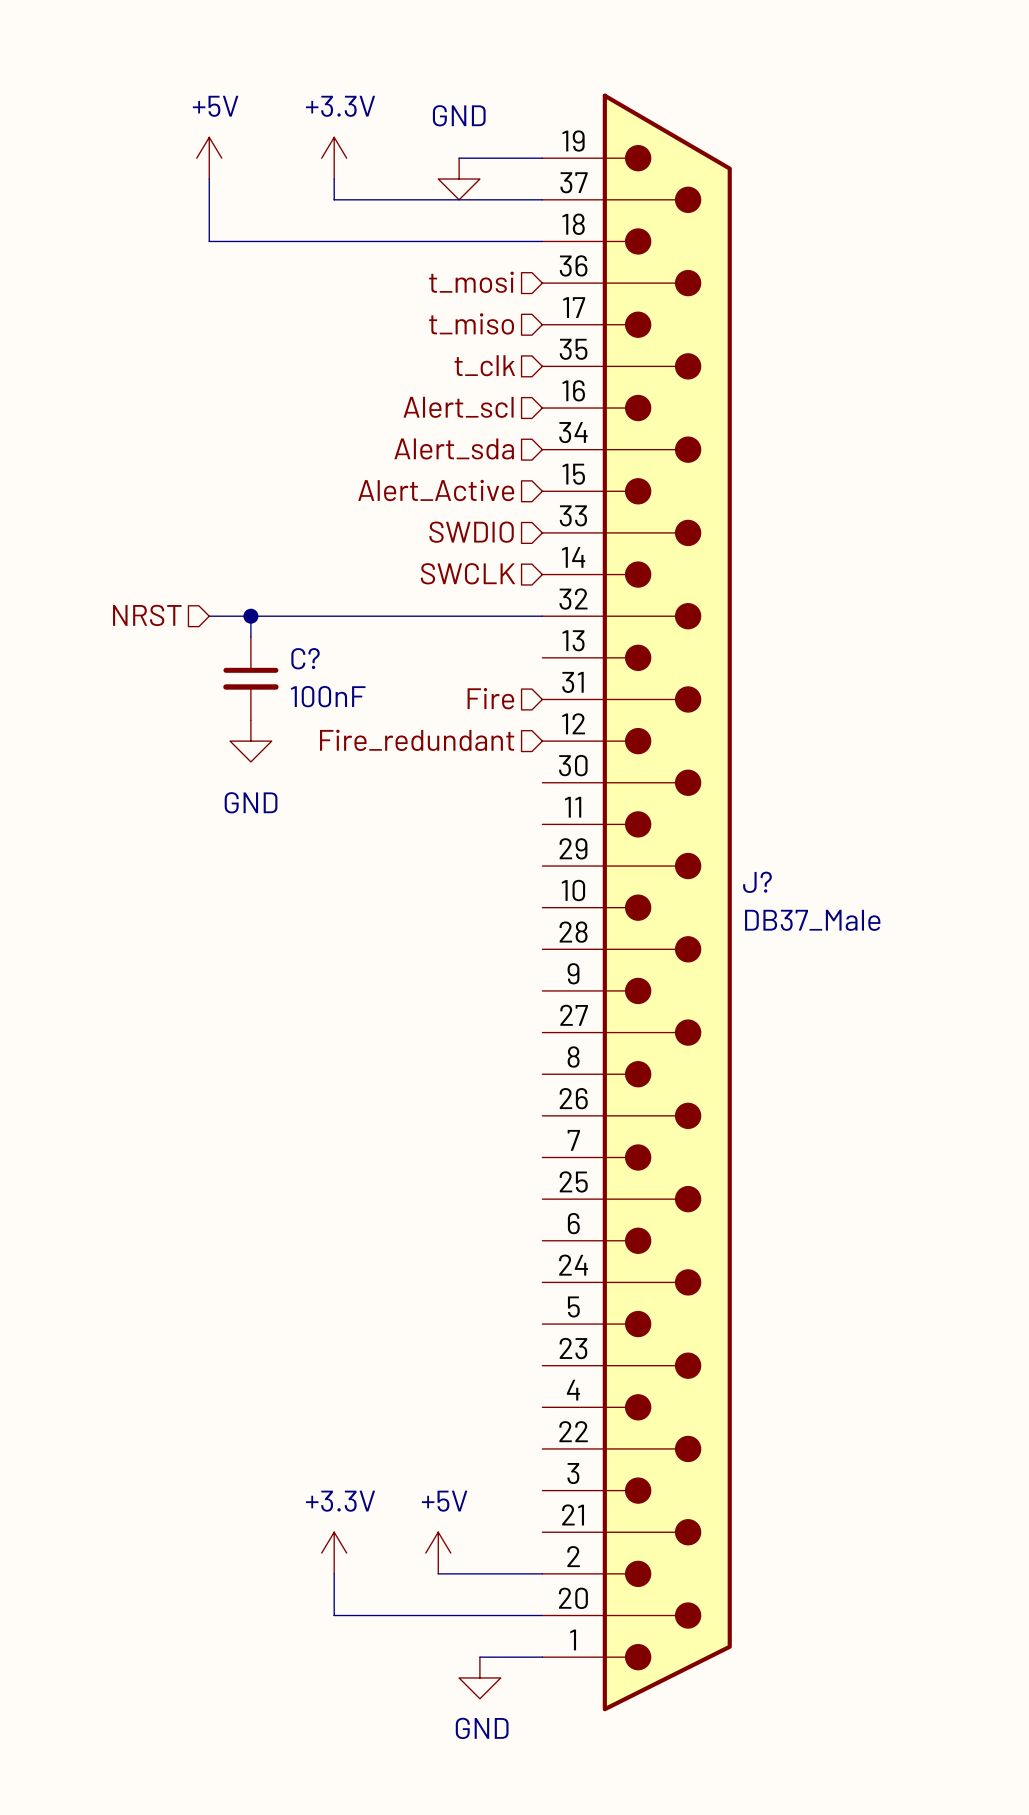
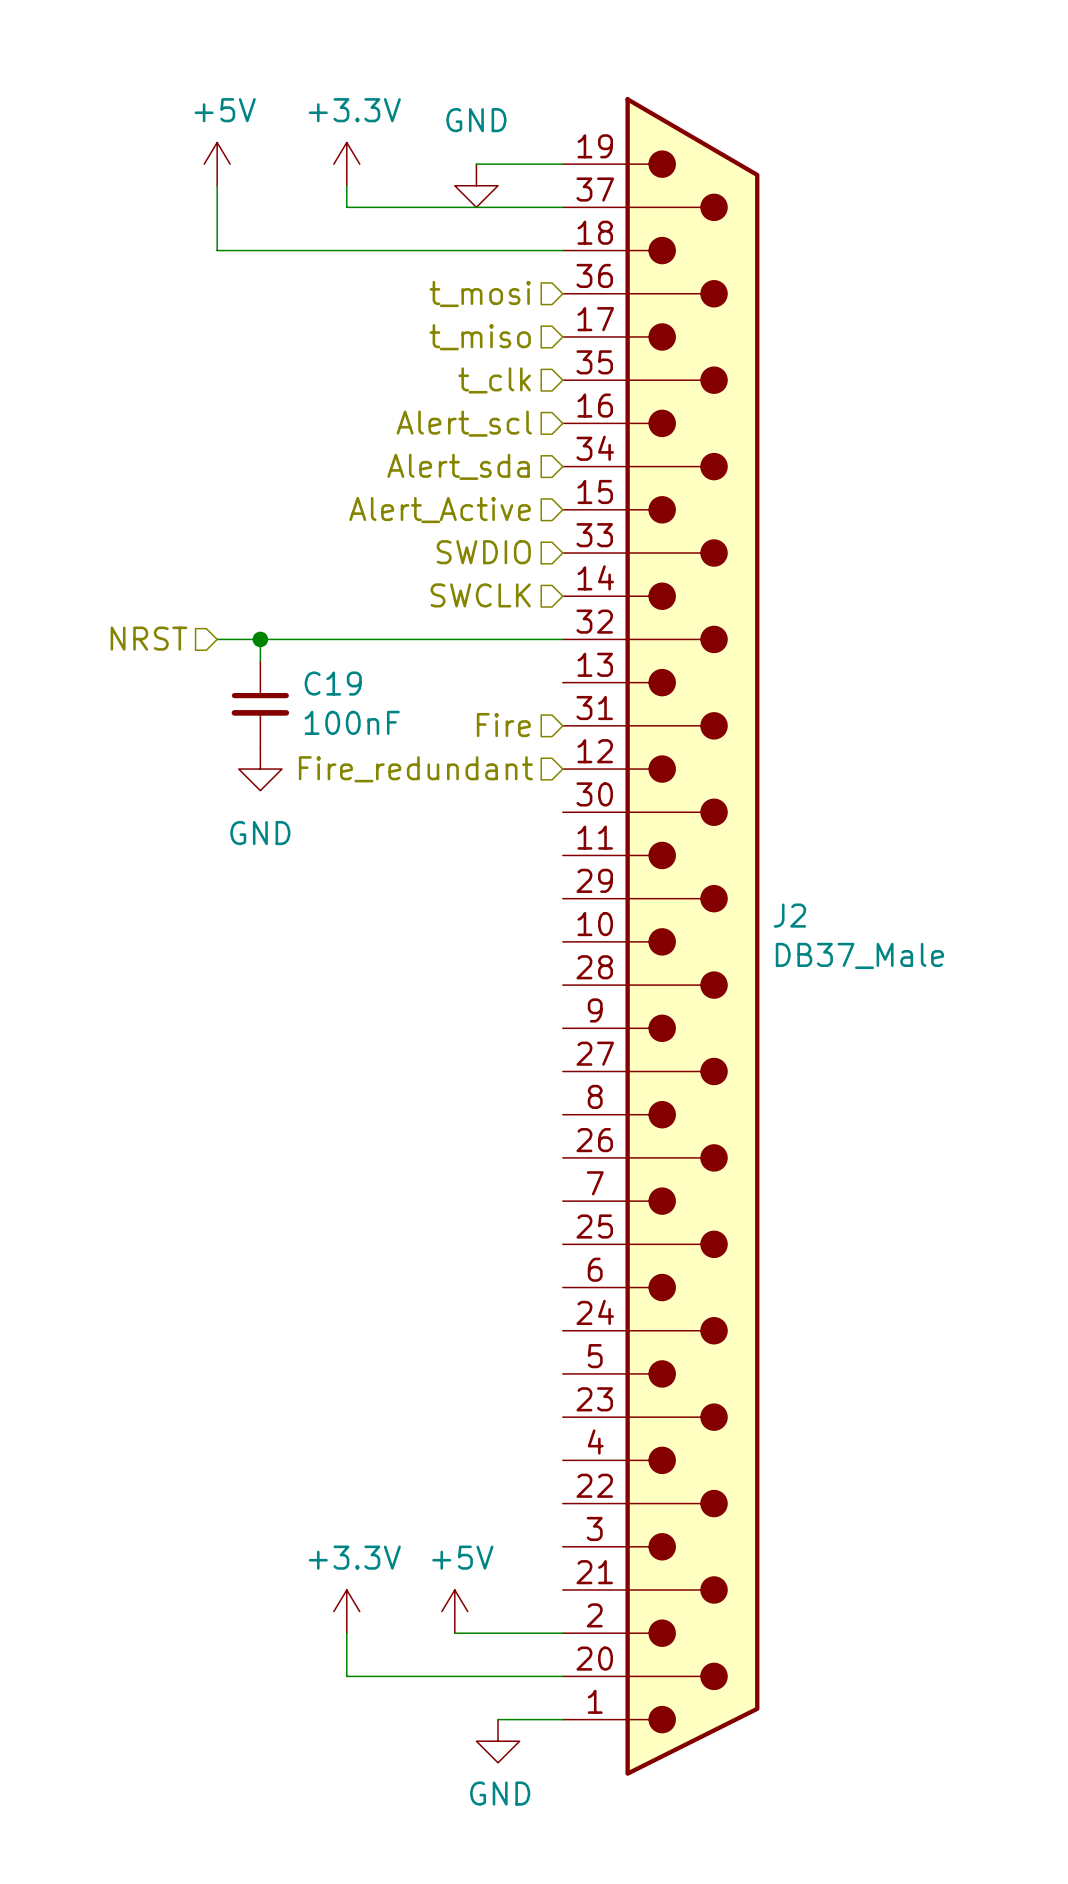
C? name: C? (305, 658) -> C19 (333, 683)
J? name: J? (757, 882) -> J2 (789, 915)

